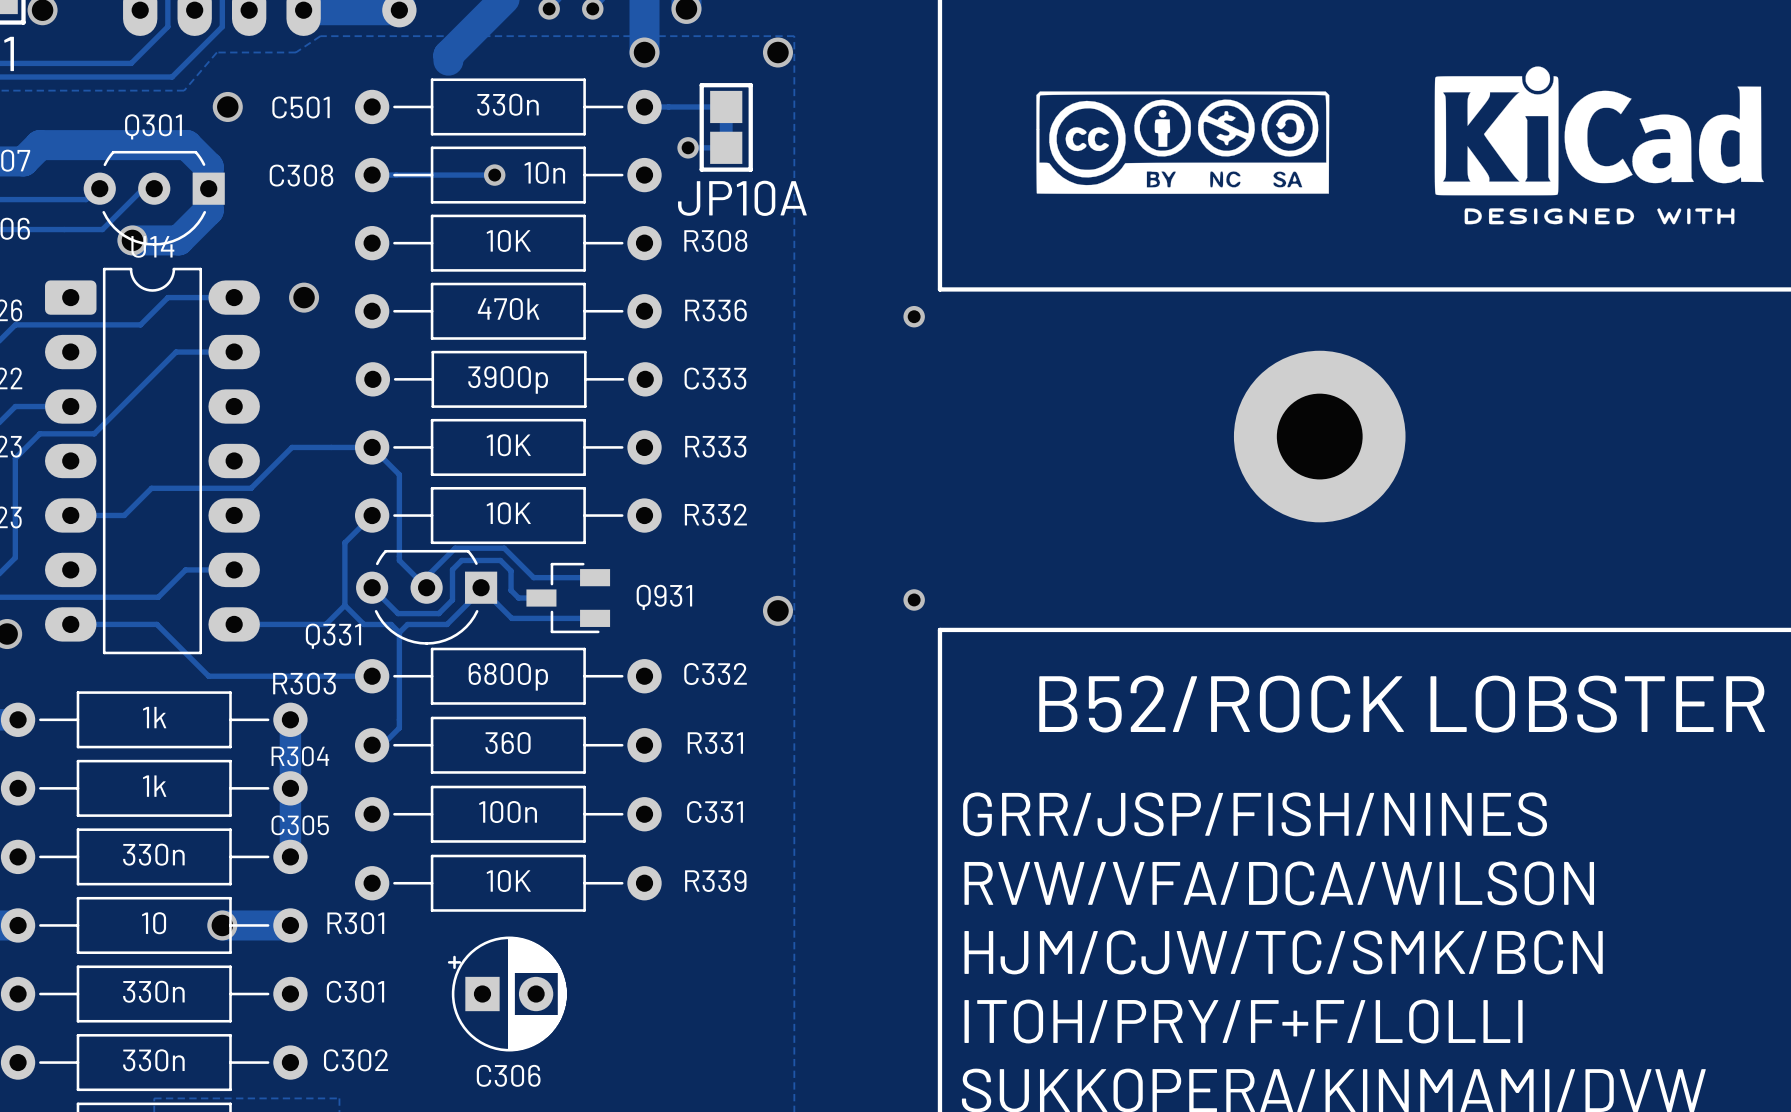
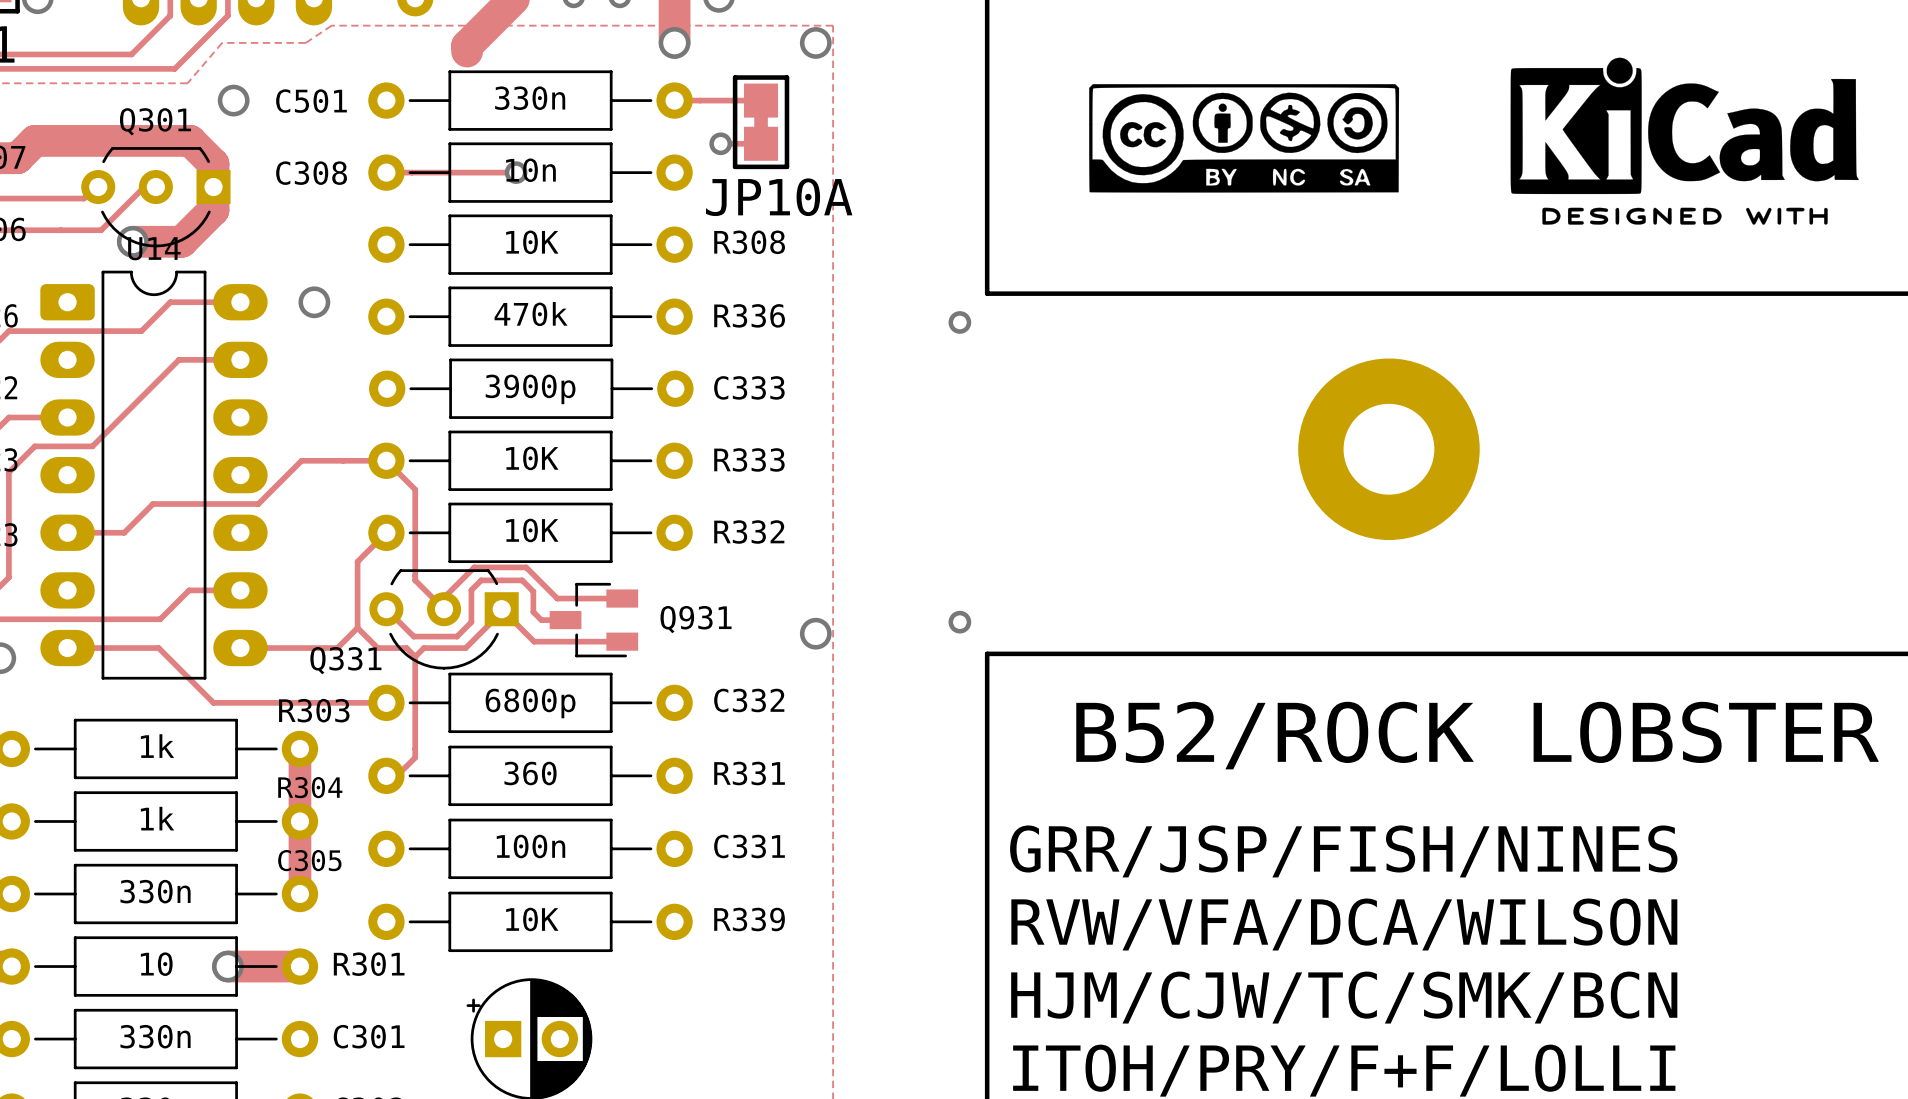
C308 value position: 10n (544, 172) -> 10n (530, 170)

